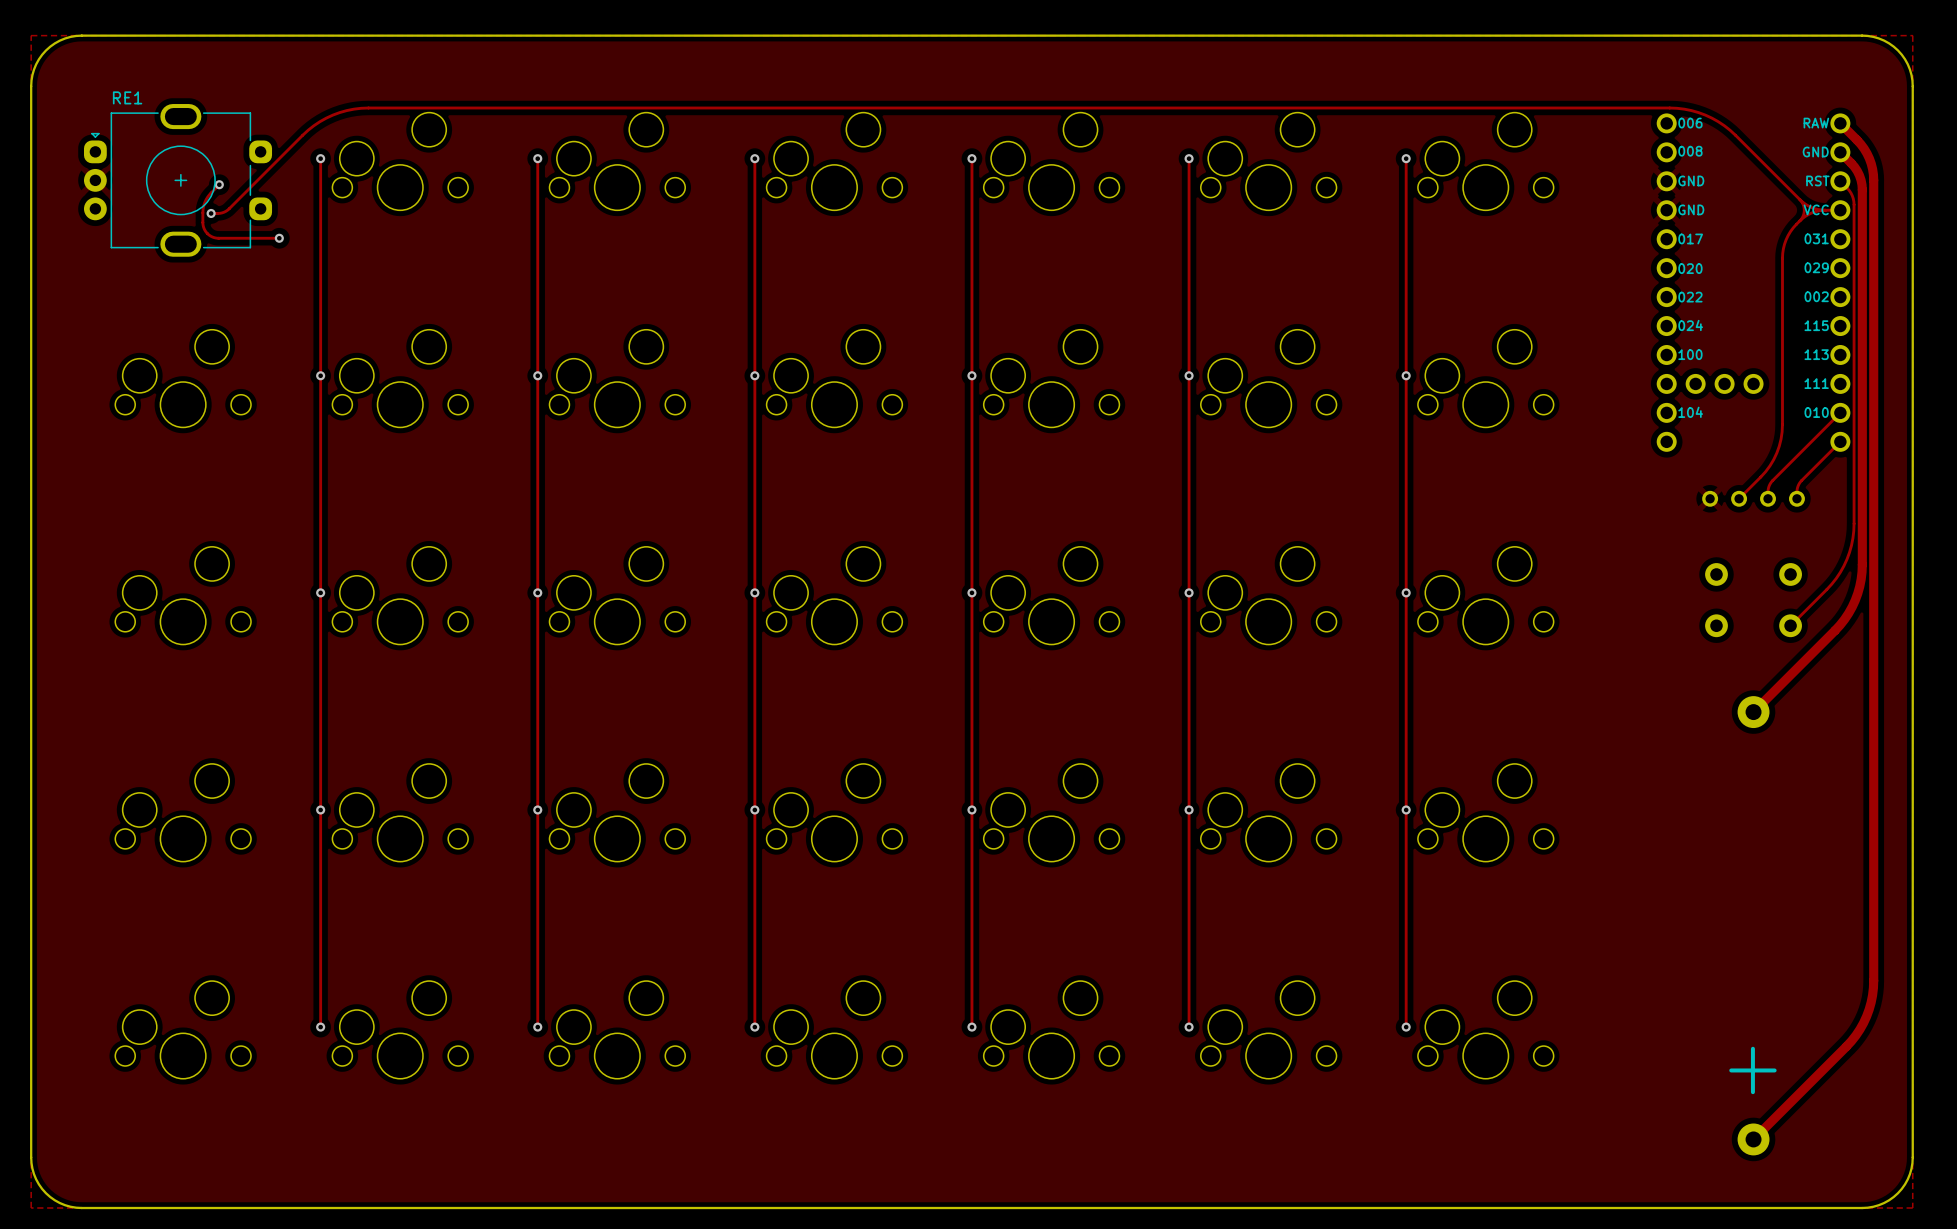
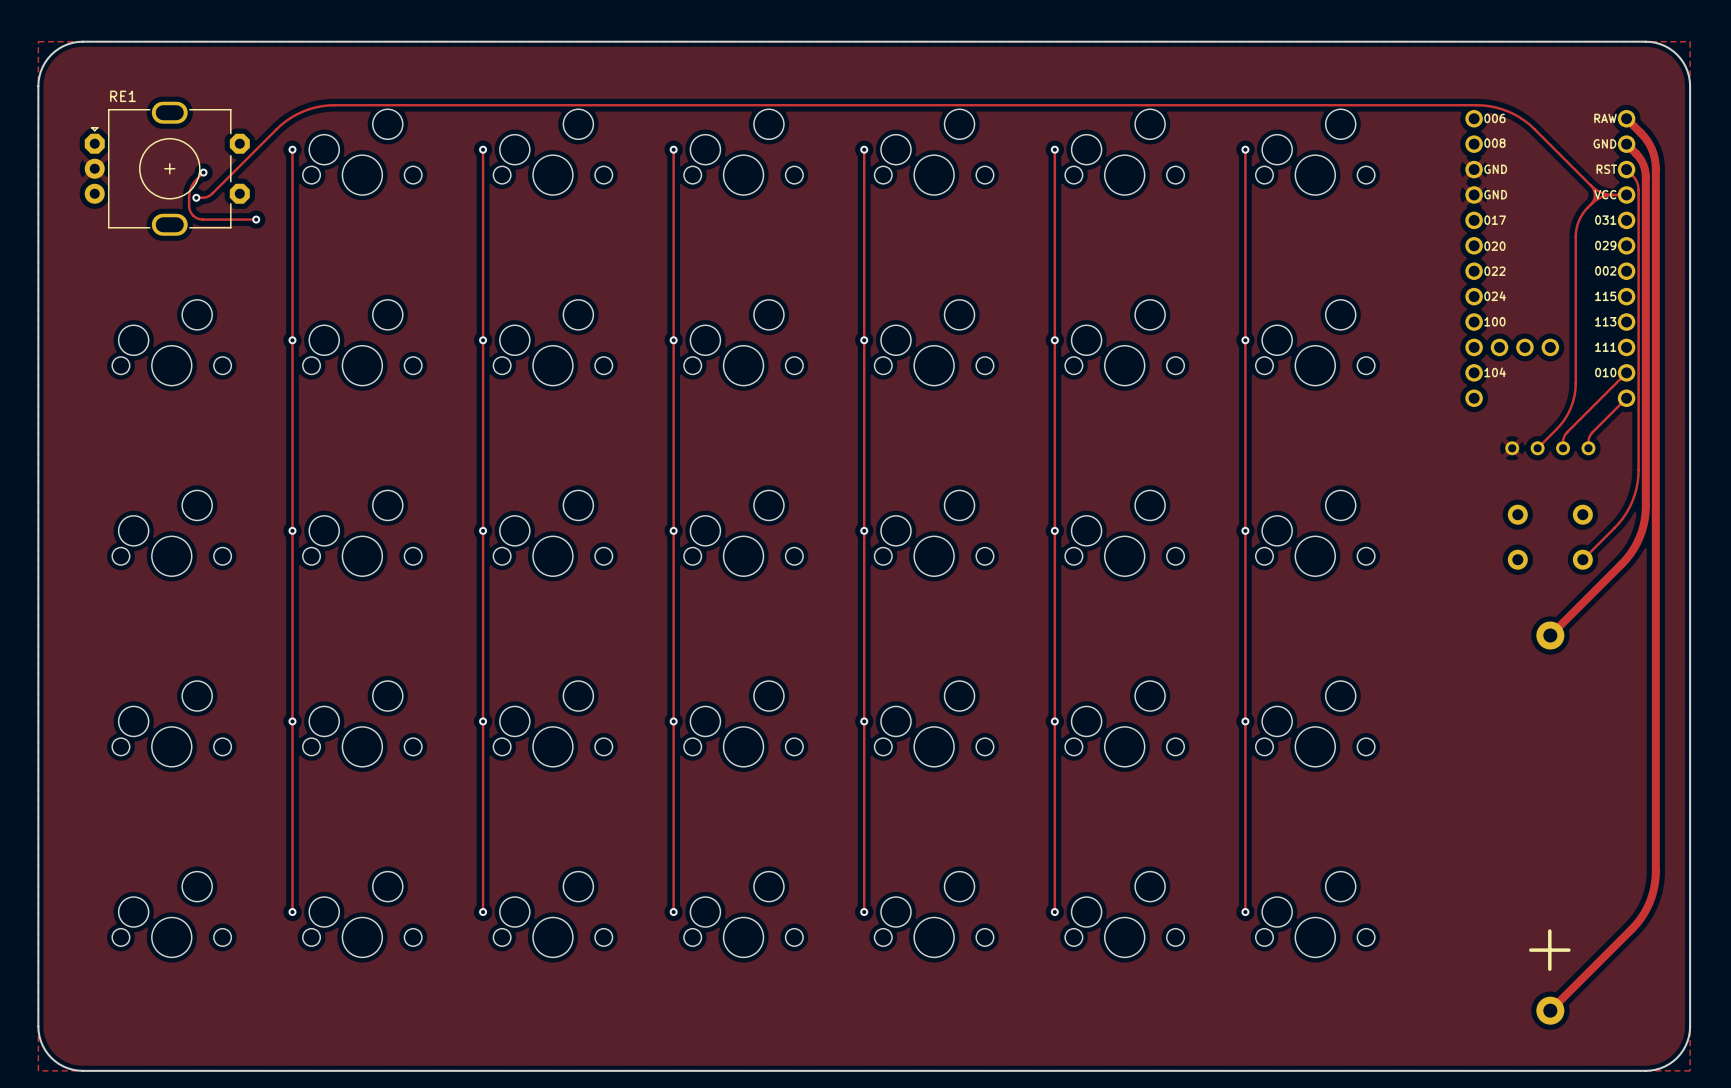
RE1 footprint: [83, 104, 273, 257] -> [84, 101, 250, 236]

